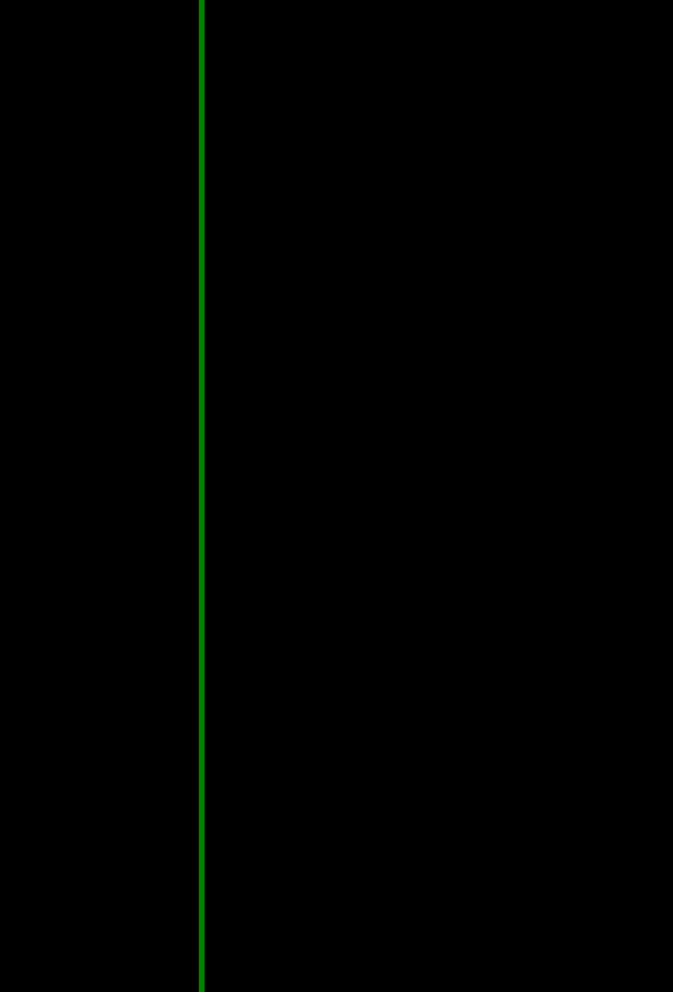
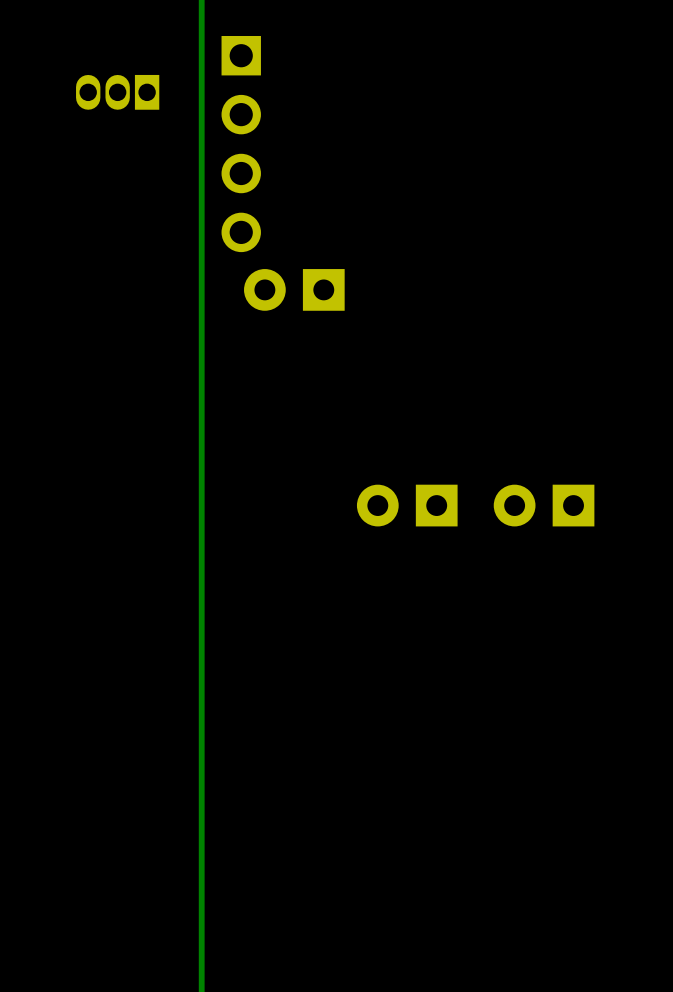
part: none -> (117, 92)
part: none -> (241, 144)
part: none -> (294, 289)
part: none -> (407, 505)
part: none -> (544, 505)

